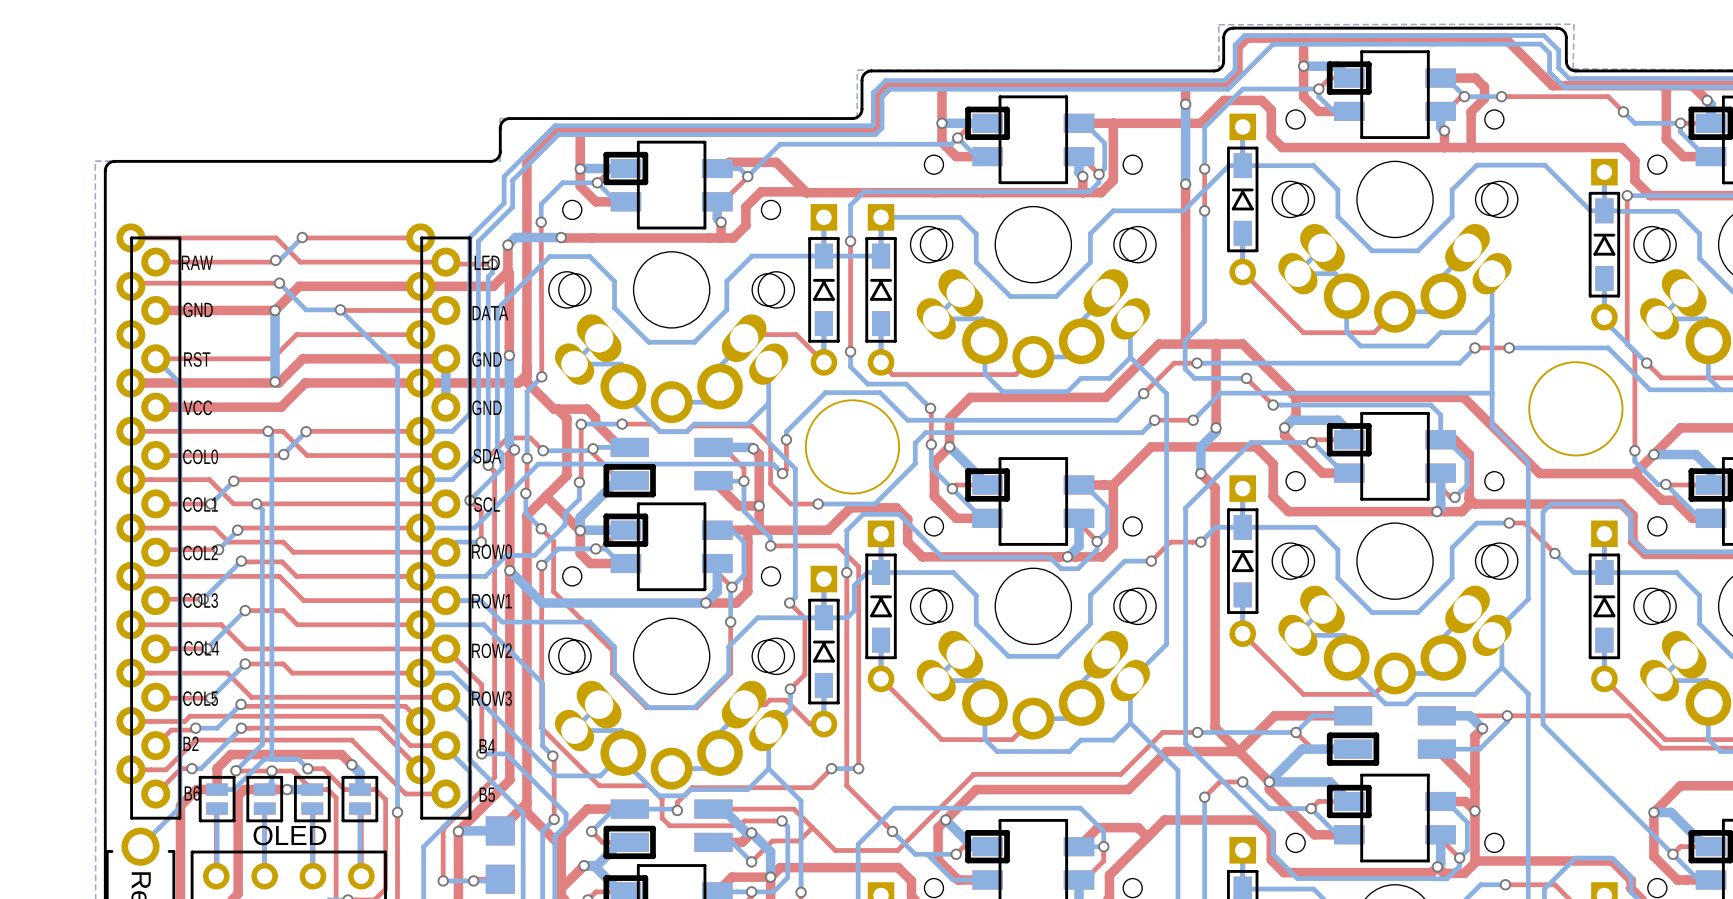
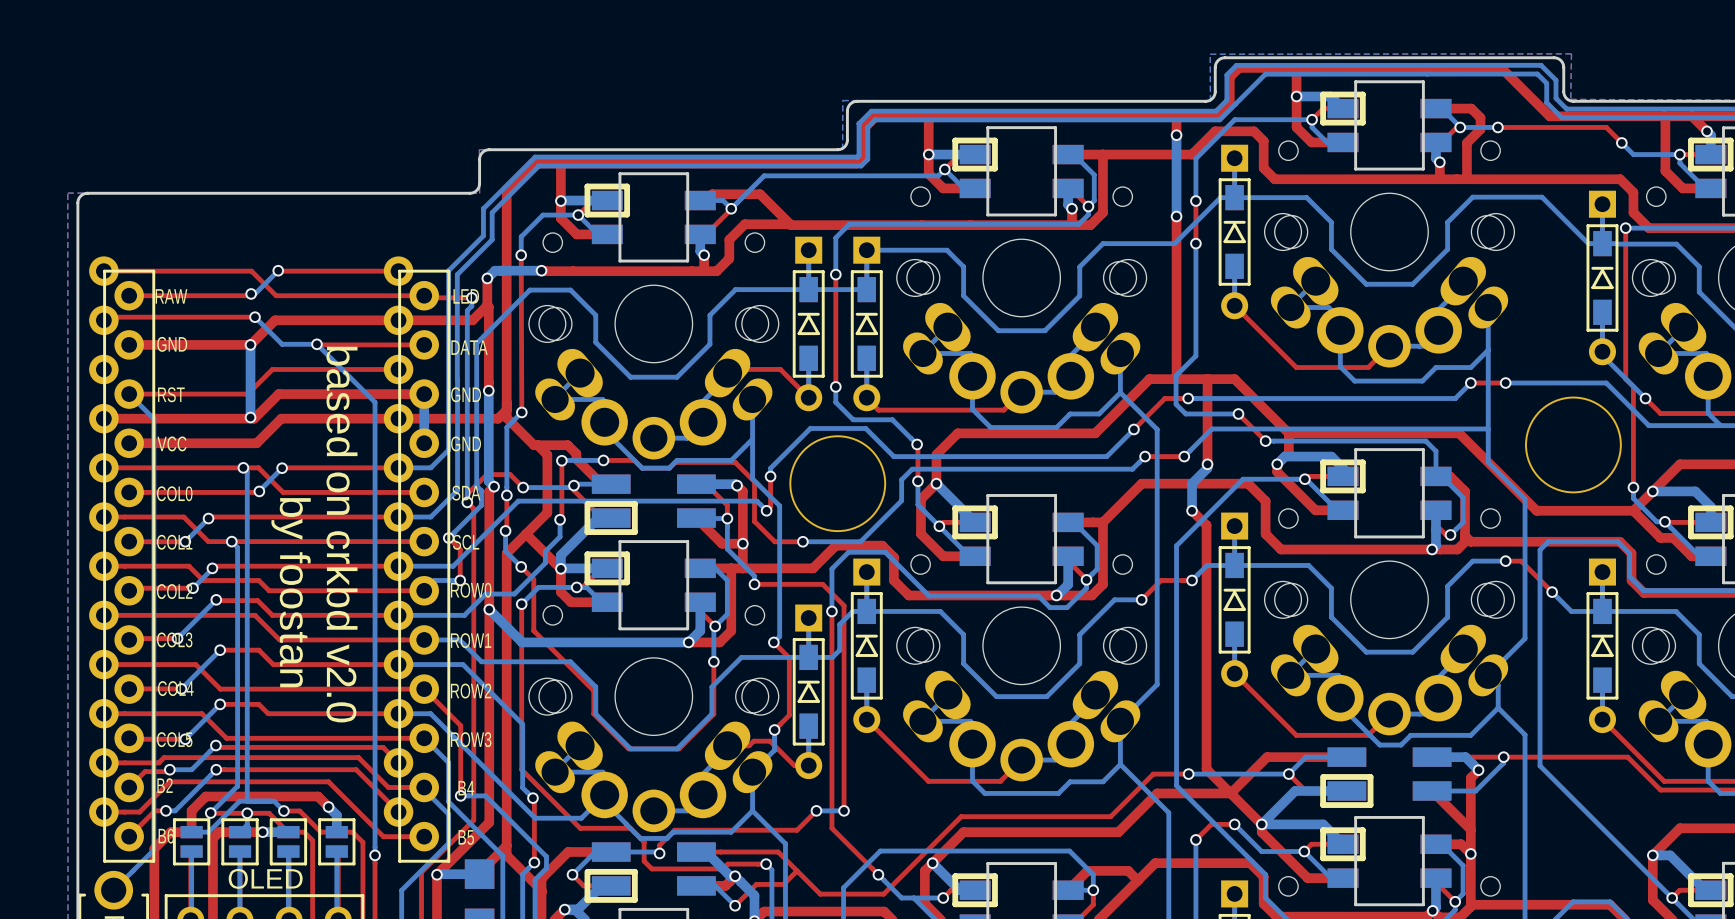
text: none -> based on crkbd v2.0 (342, 534)
text: none -> by foostan (291, 592)

